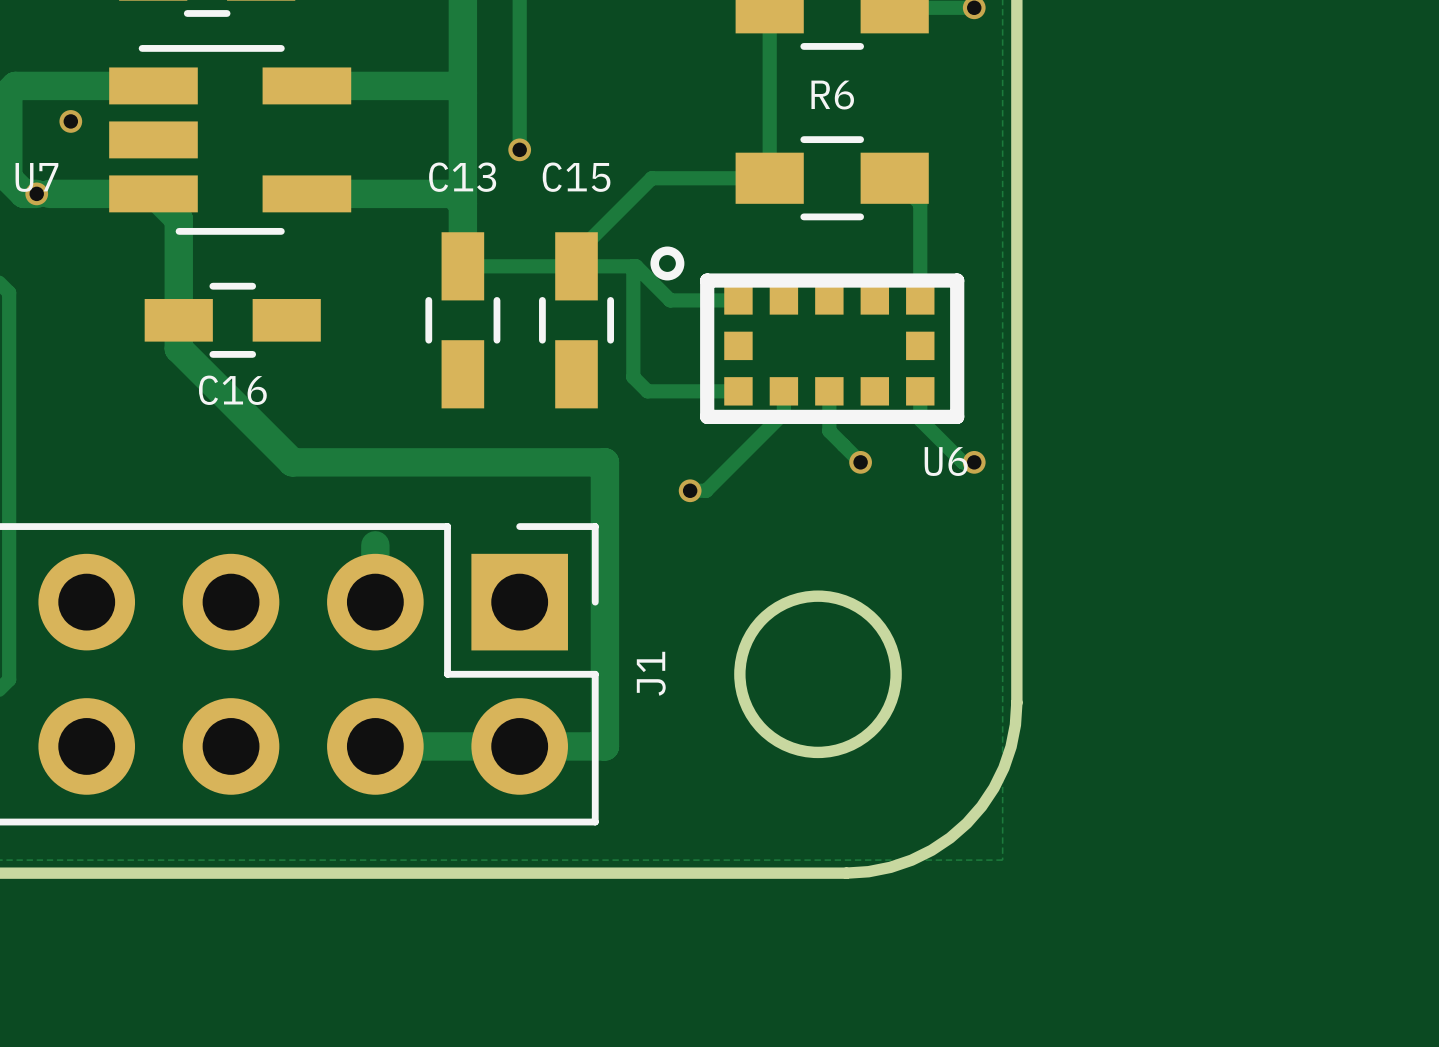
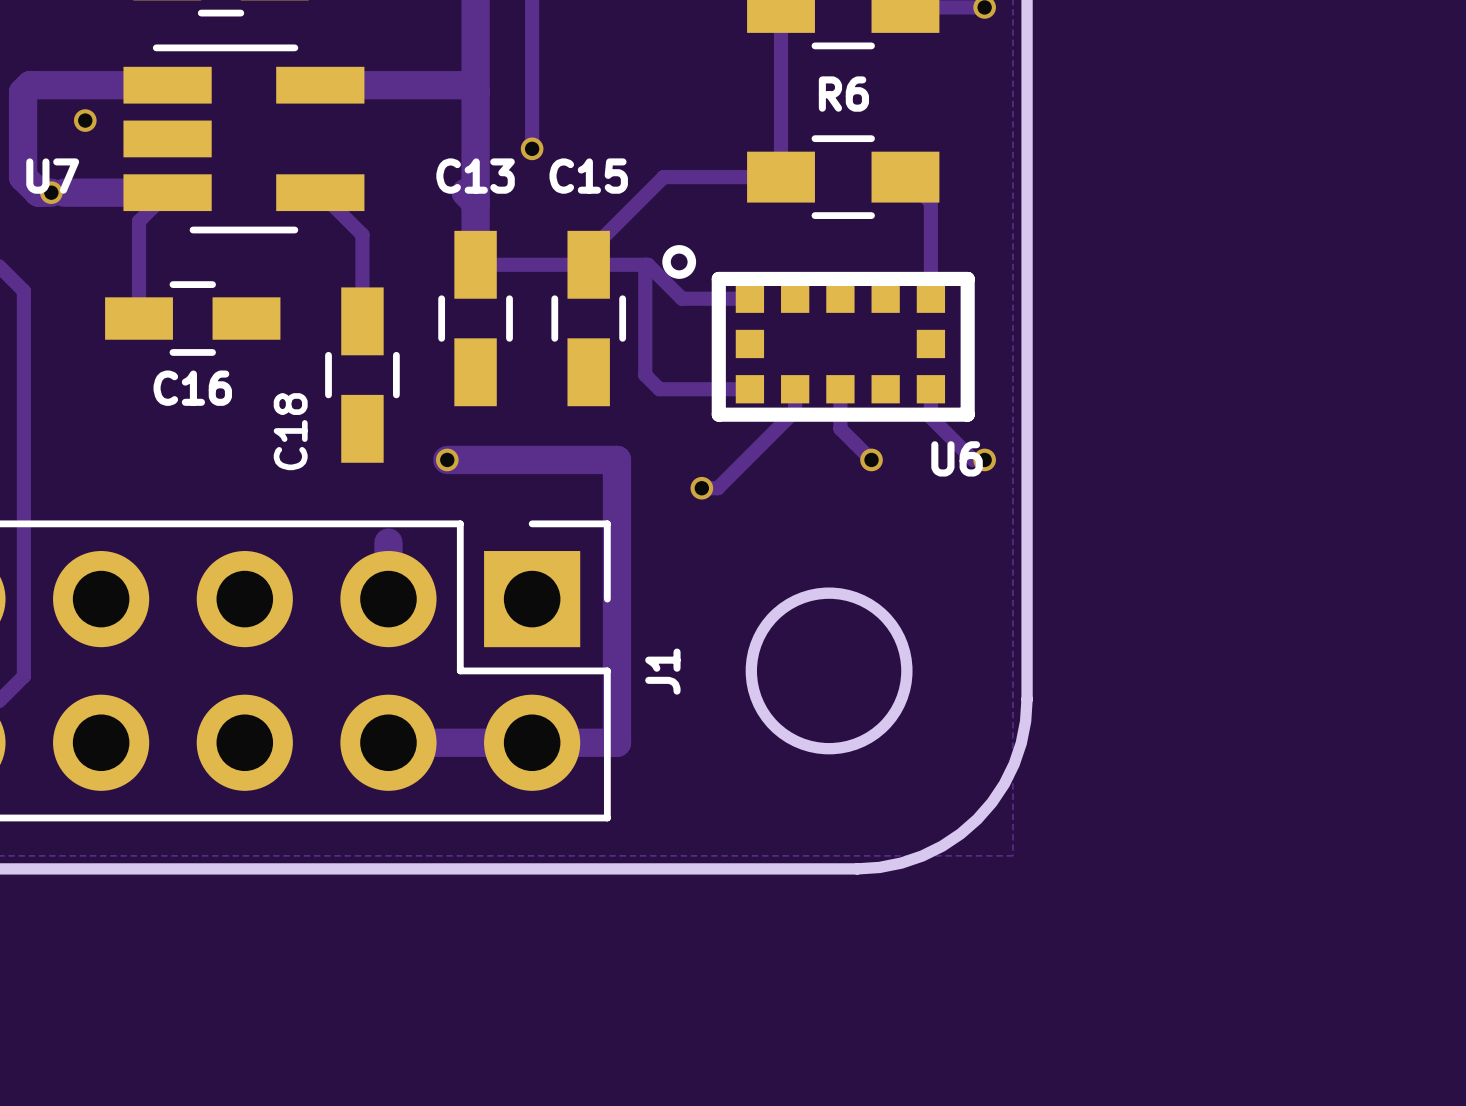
track: (153, 193) (178, 219) (178, 348) (292, 462) (434, 462) -> (167, 192) (139, 221) (139, 318)
track: (306, 193) (452, 193) -> (320, 192) (362, 234) (362, 321)
C16 position: (232, 320) -> (192, 318)
C18: none -> (362, 375)
via: none -> (447, 459)

